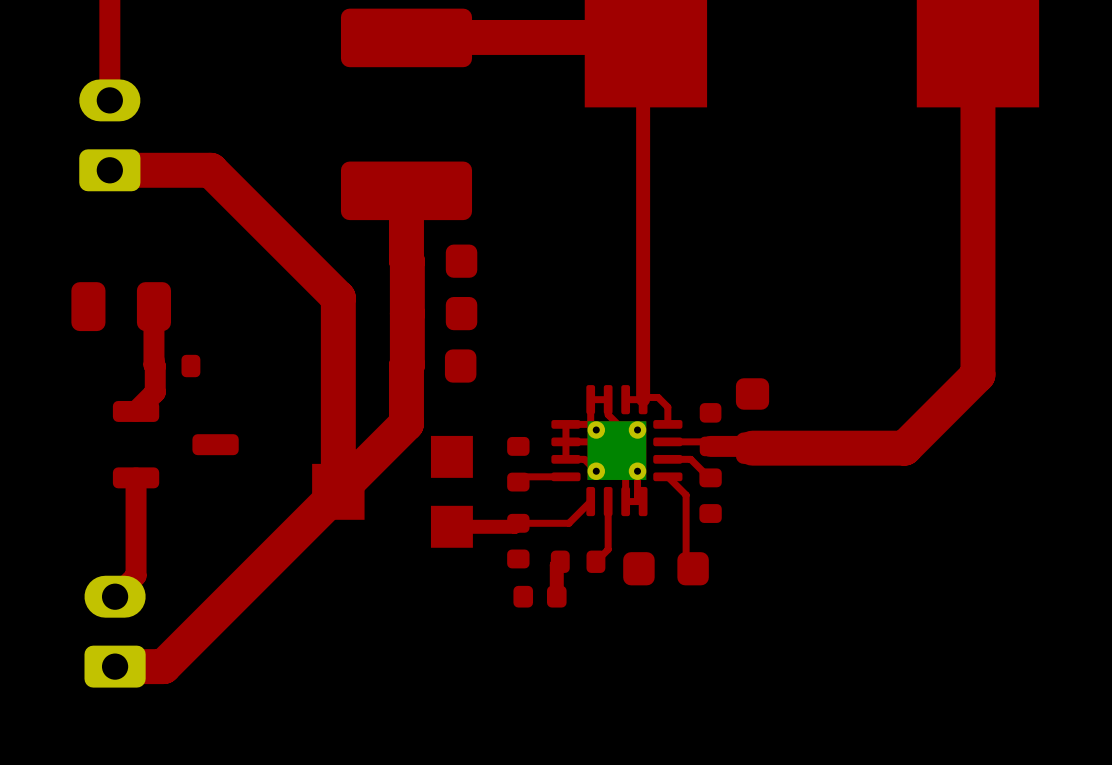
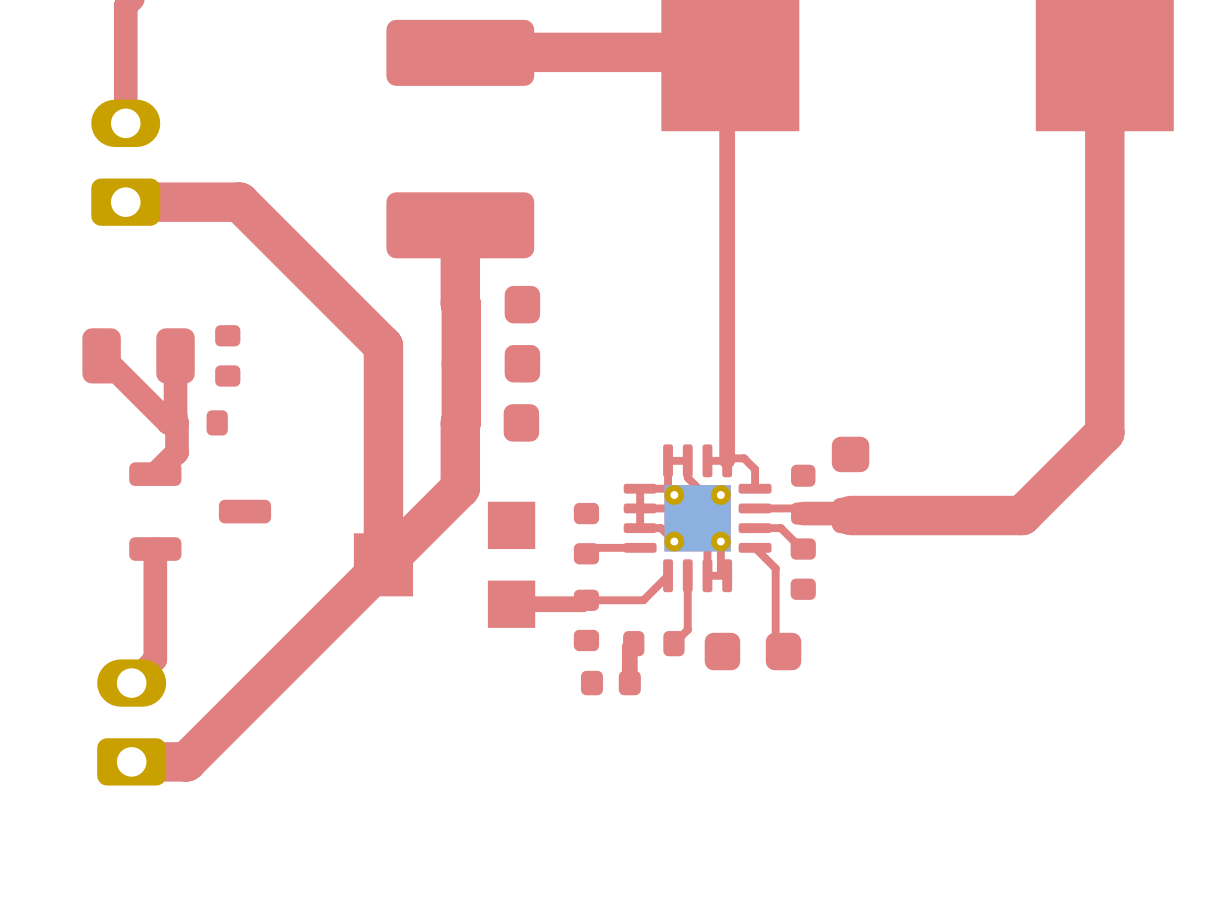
top track: none -> (101, 355) (168, 422) (176, 422)
part: none -> (227, 355)

